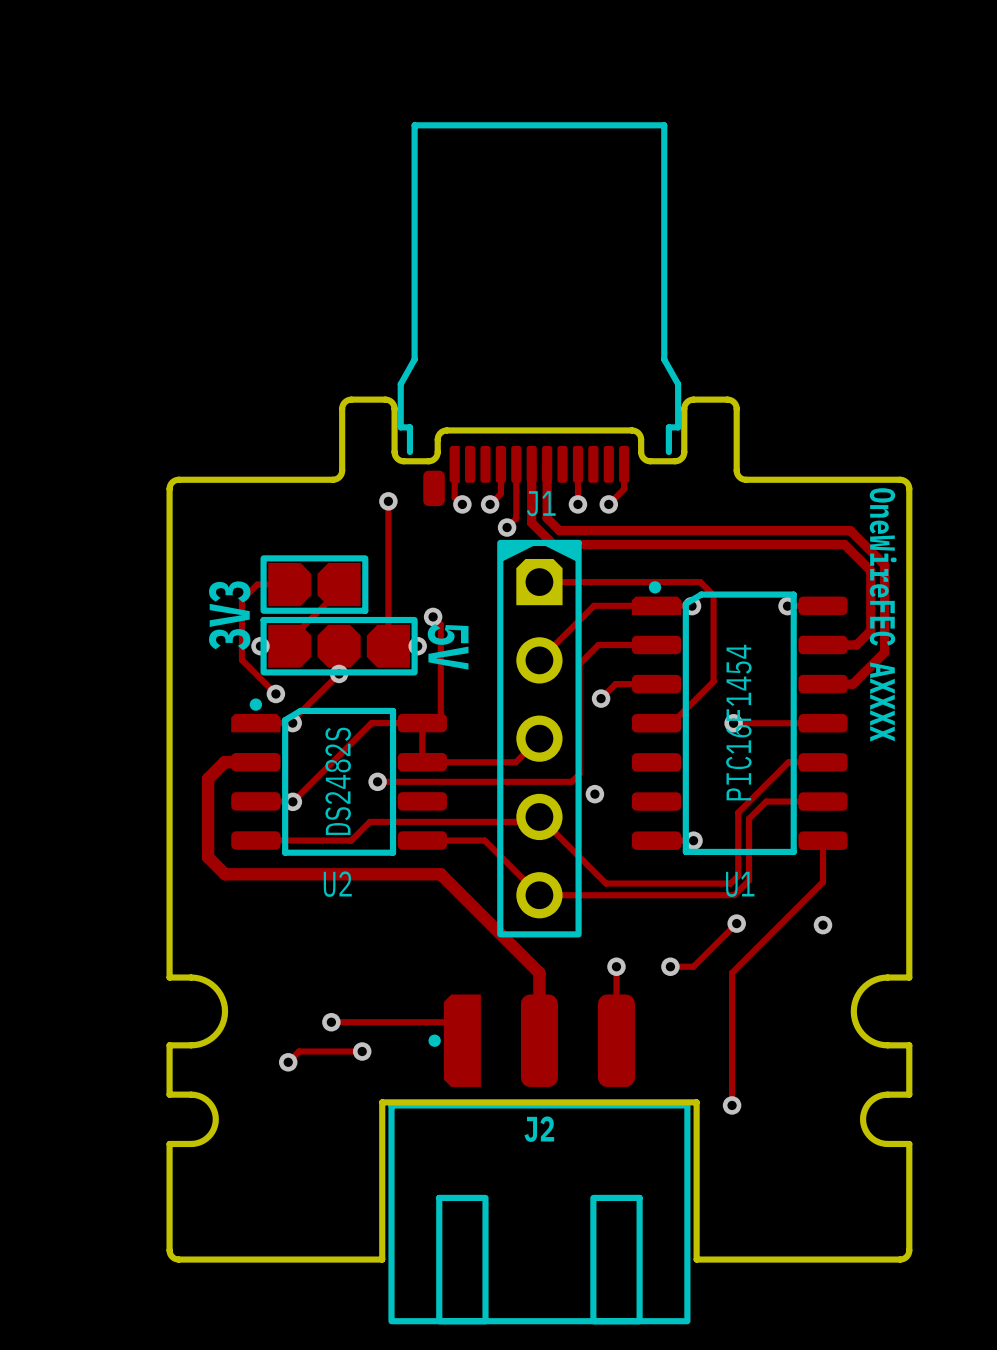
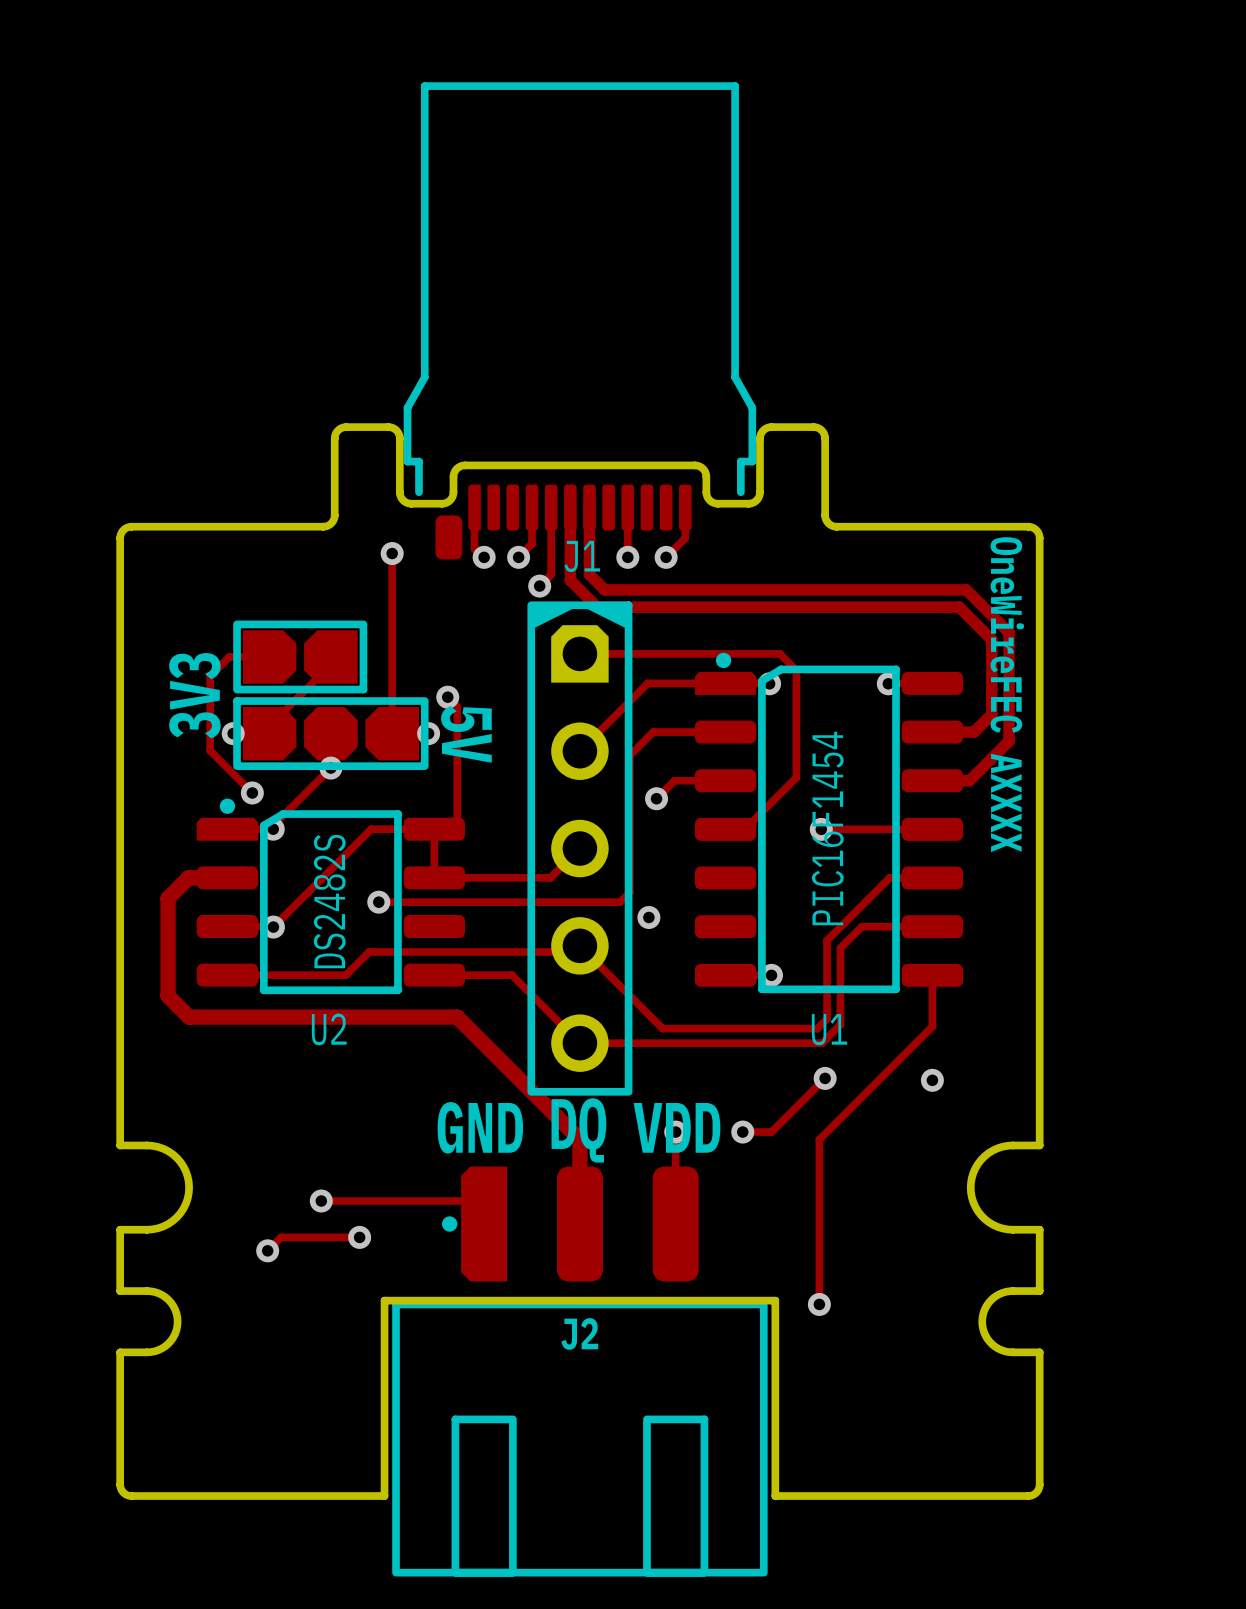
text: none -> GND (480, 1127)
text: none -> VDD (677, 1127)
text: none -> DQ (578, 1130)

